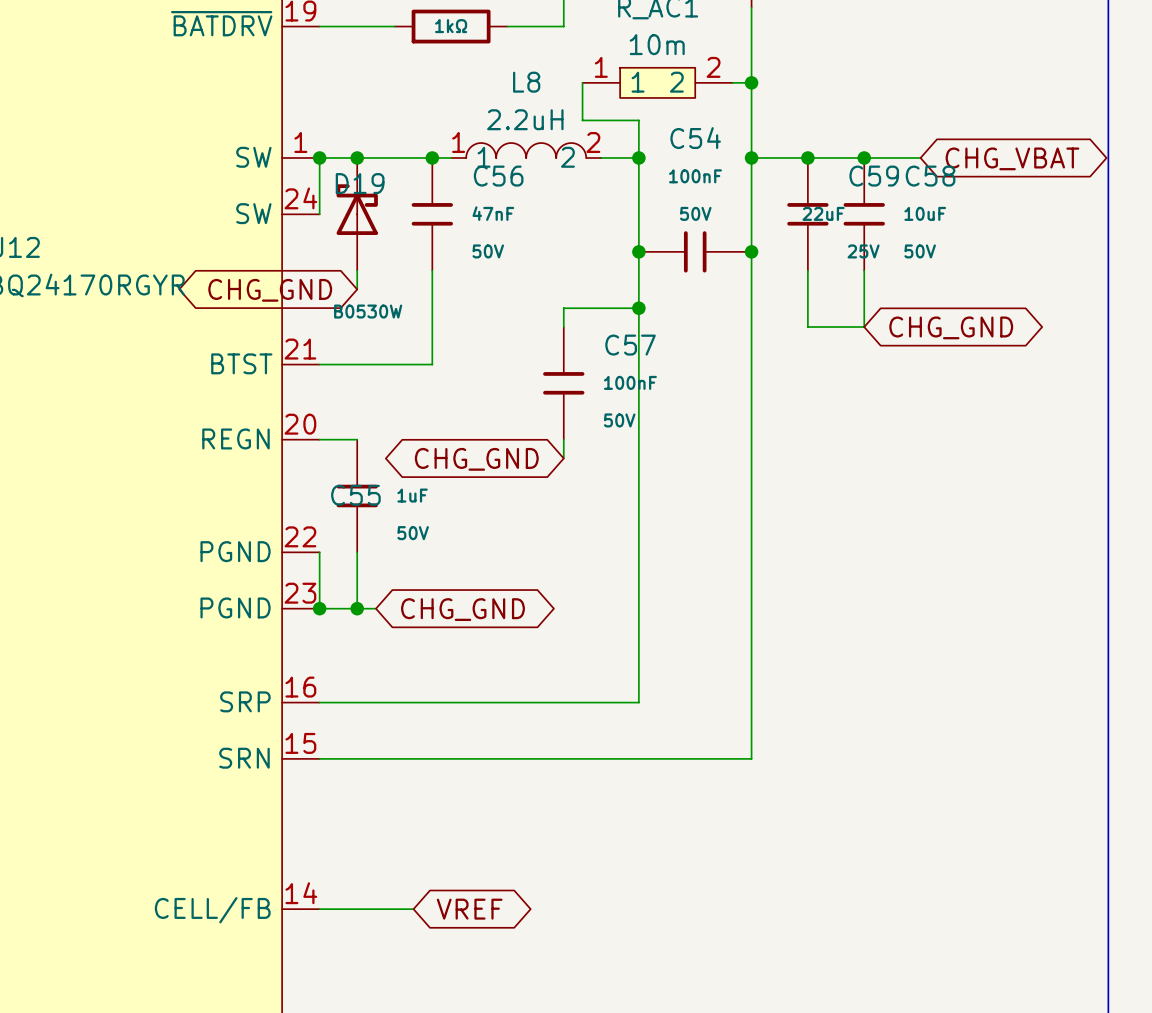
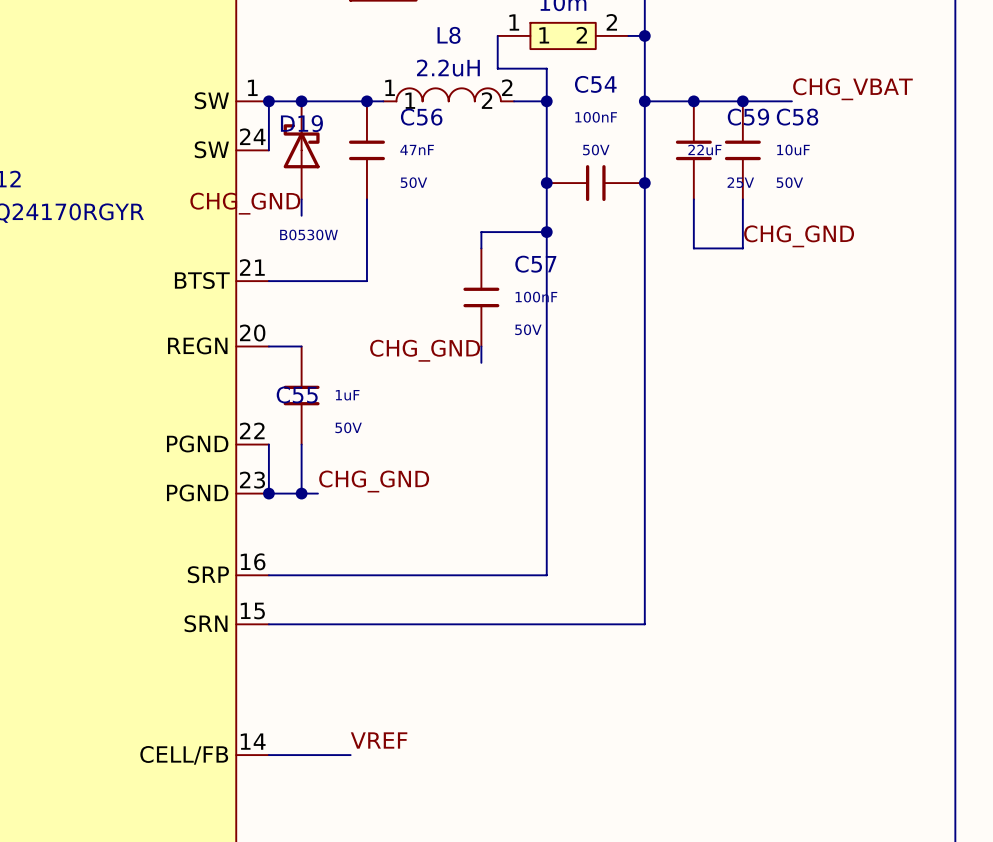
label: none -> CHG_VBAT (852, 89)
global label: CHG_VBAT (1012, 158) -> none
label: none -> CHG_GND (245, 203)
global label: CHG_GND (270, 290) -> none
label: none -> CHG_GND (799, 236)
global label: CHG_GND (951, 327) -> none
label: none -> CHG_GND (425, 350)
global label: CHG_GND (476, 459) -> none
label: none -> CHG_GND (374, 481)
global label: CHG_GND (462, 609) -> none
label: none -> VREF (379, 740)
global label: VREF (469, 909) -> none

